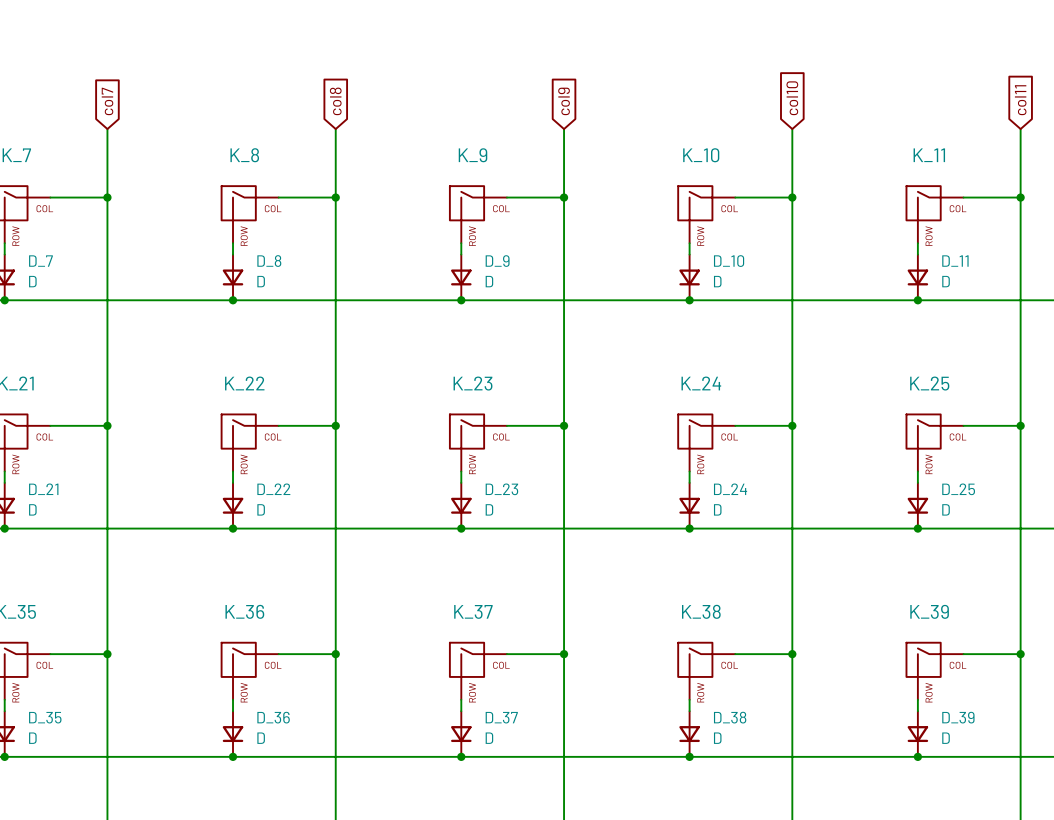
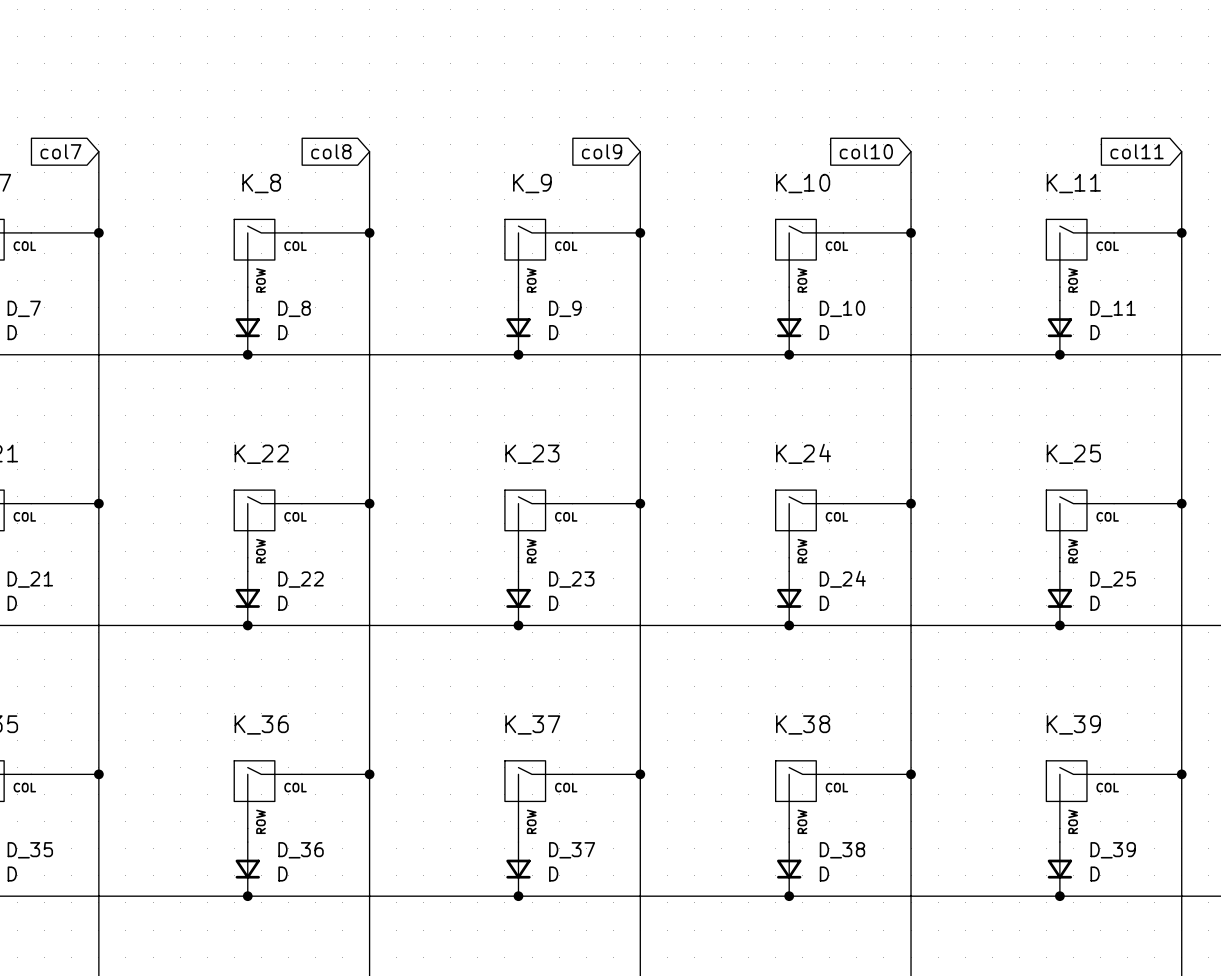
global label rotation: 0° (792, 98) -> 90° counterclockwise (866, 151)
global label rotation: 0° (1020, 100) -> 90° counterclockwise (1137, 151)
global label rotation: 0° (107, 101) -> 90° counterclockwise (60, 151)
global label rotation: 0° (335, 101) -> 90° counterclockwise (331, 151)
global label rotation: 0° (564, 101) -> 90° counterclockwise (602, 151)

